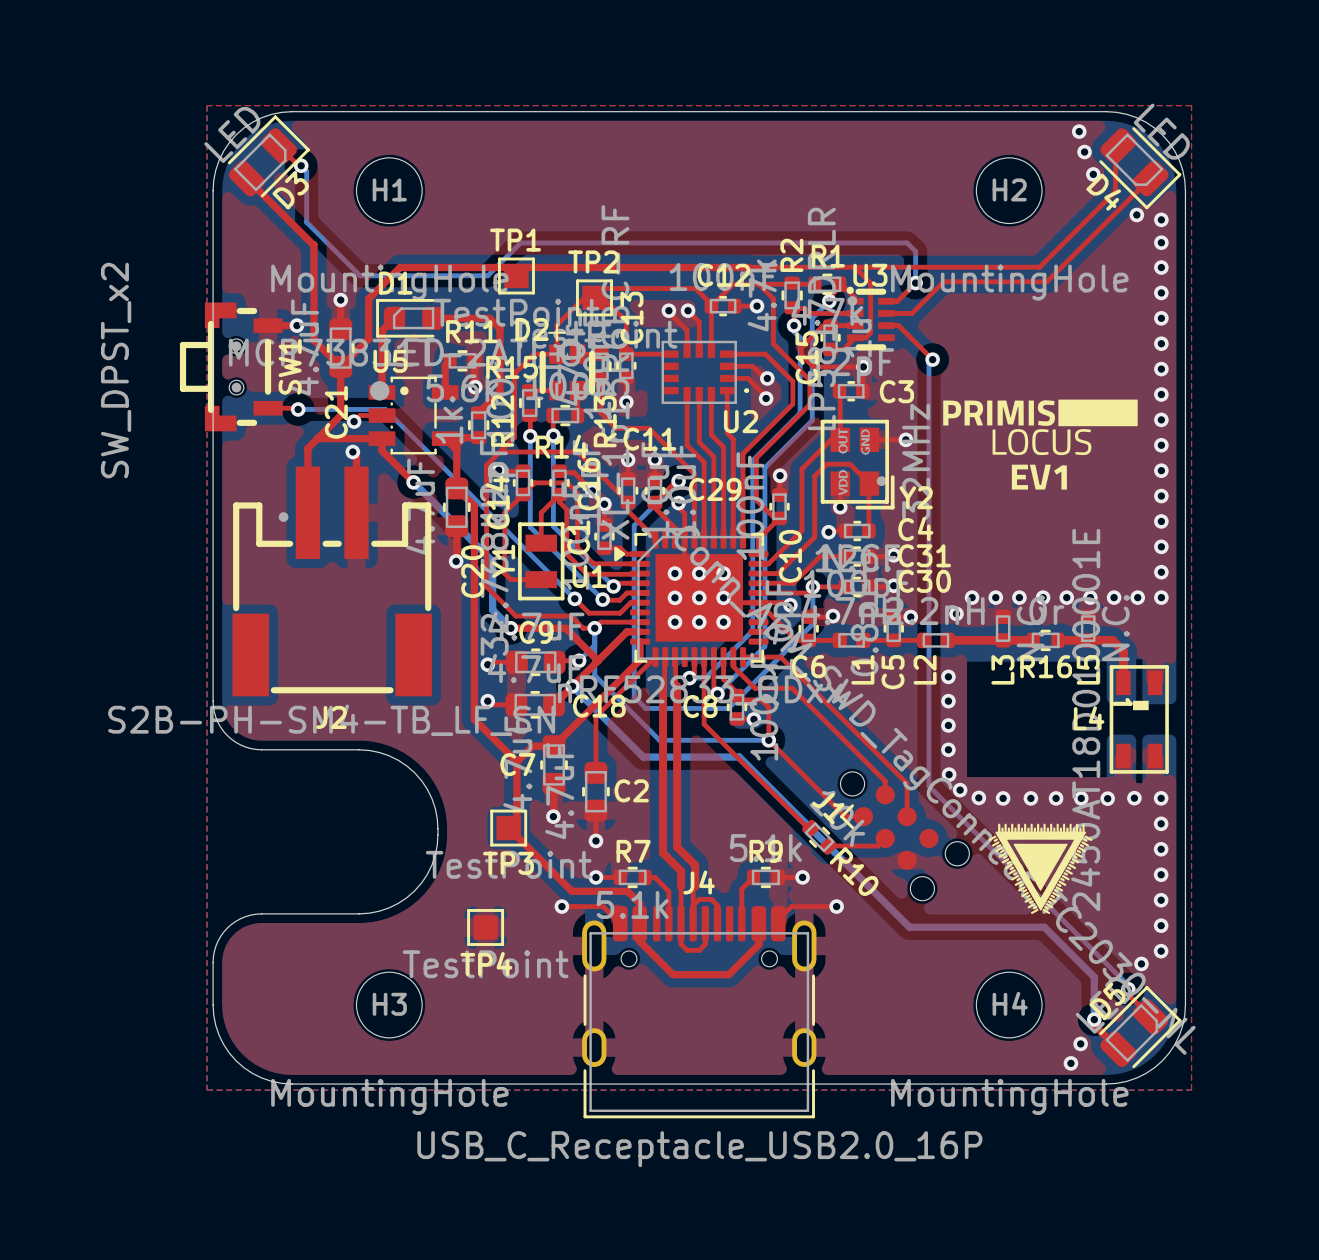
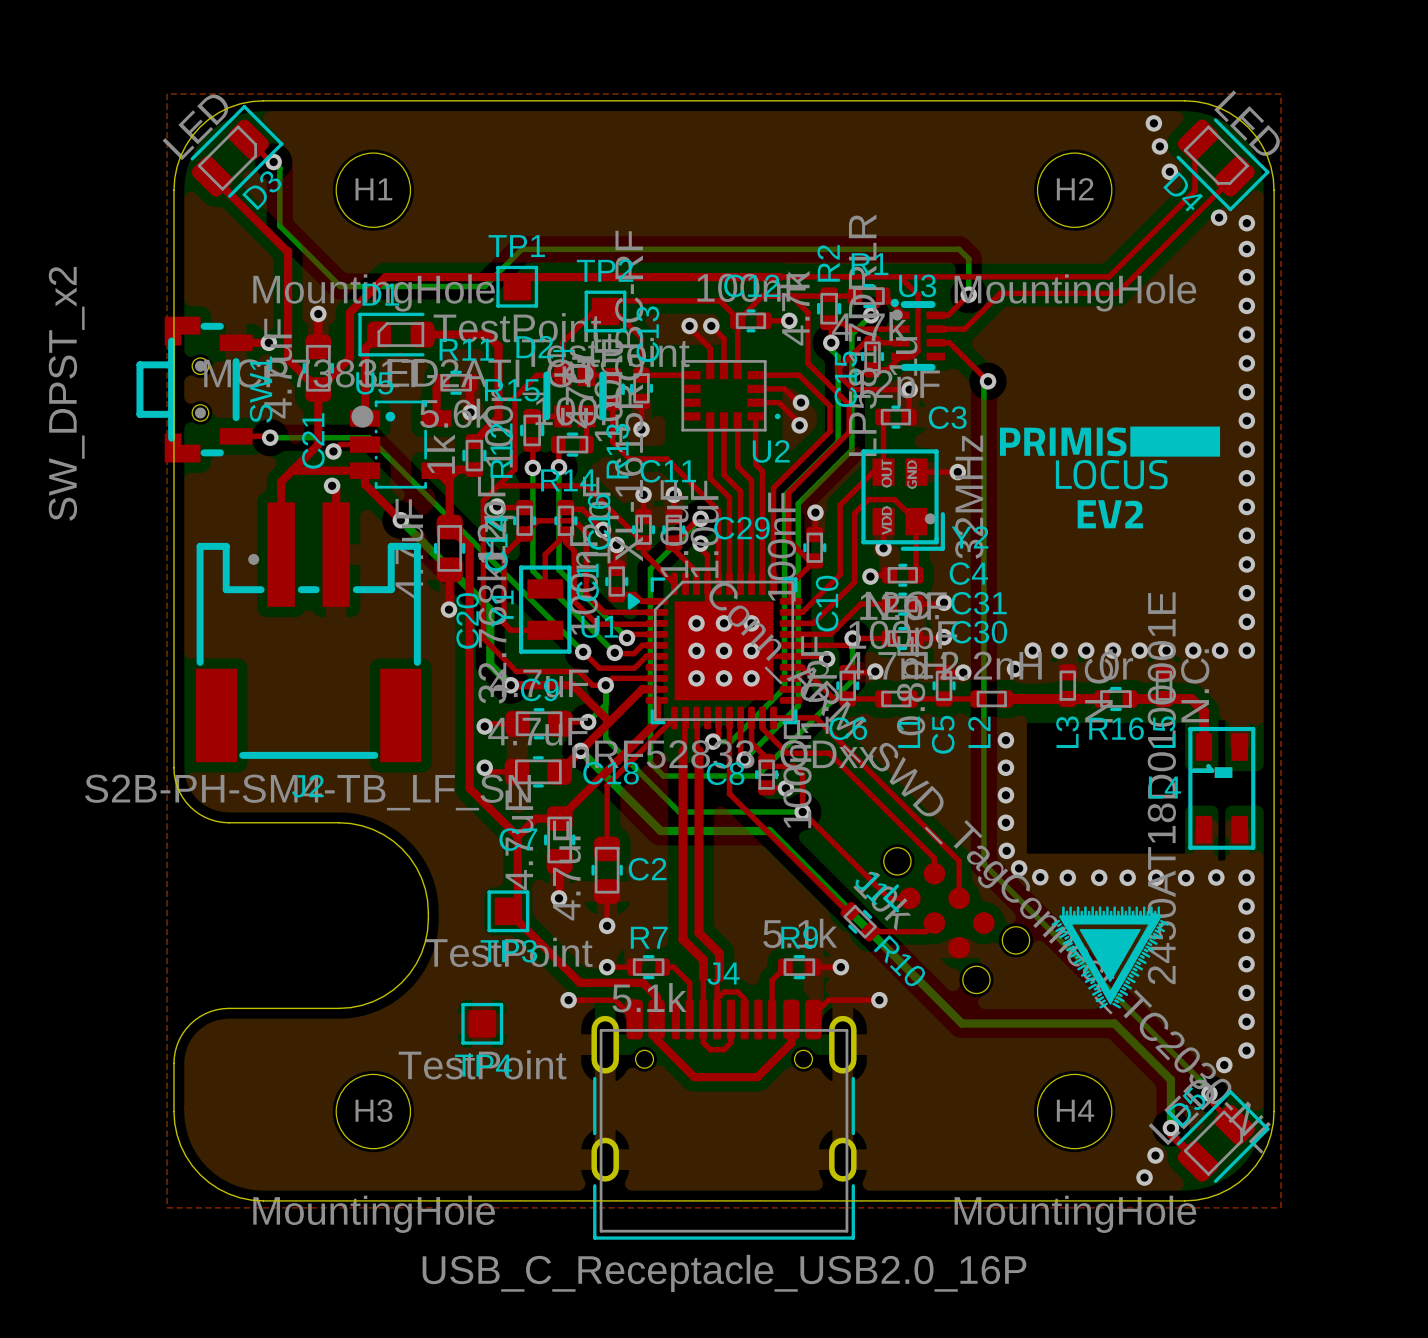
drawing shape: [943, 399, 1138, 490] -> [1000, 426, 1221, 529]

